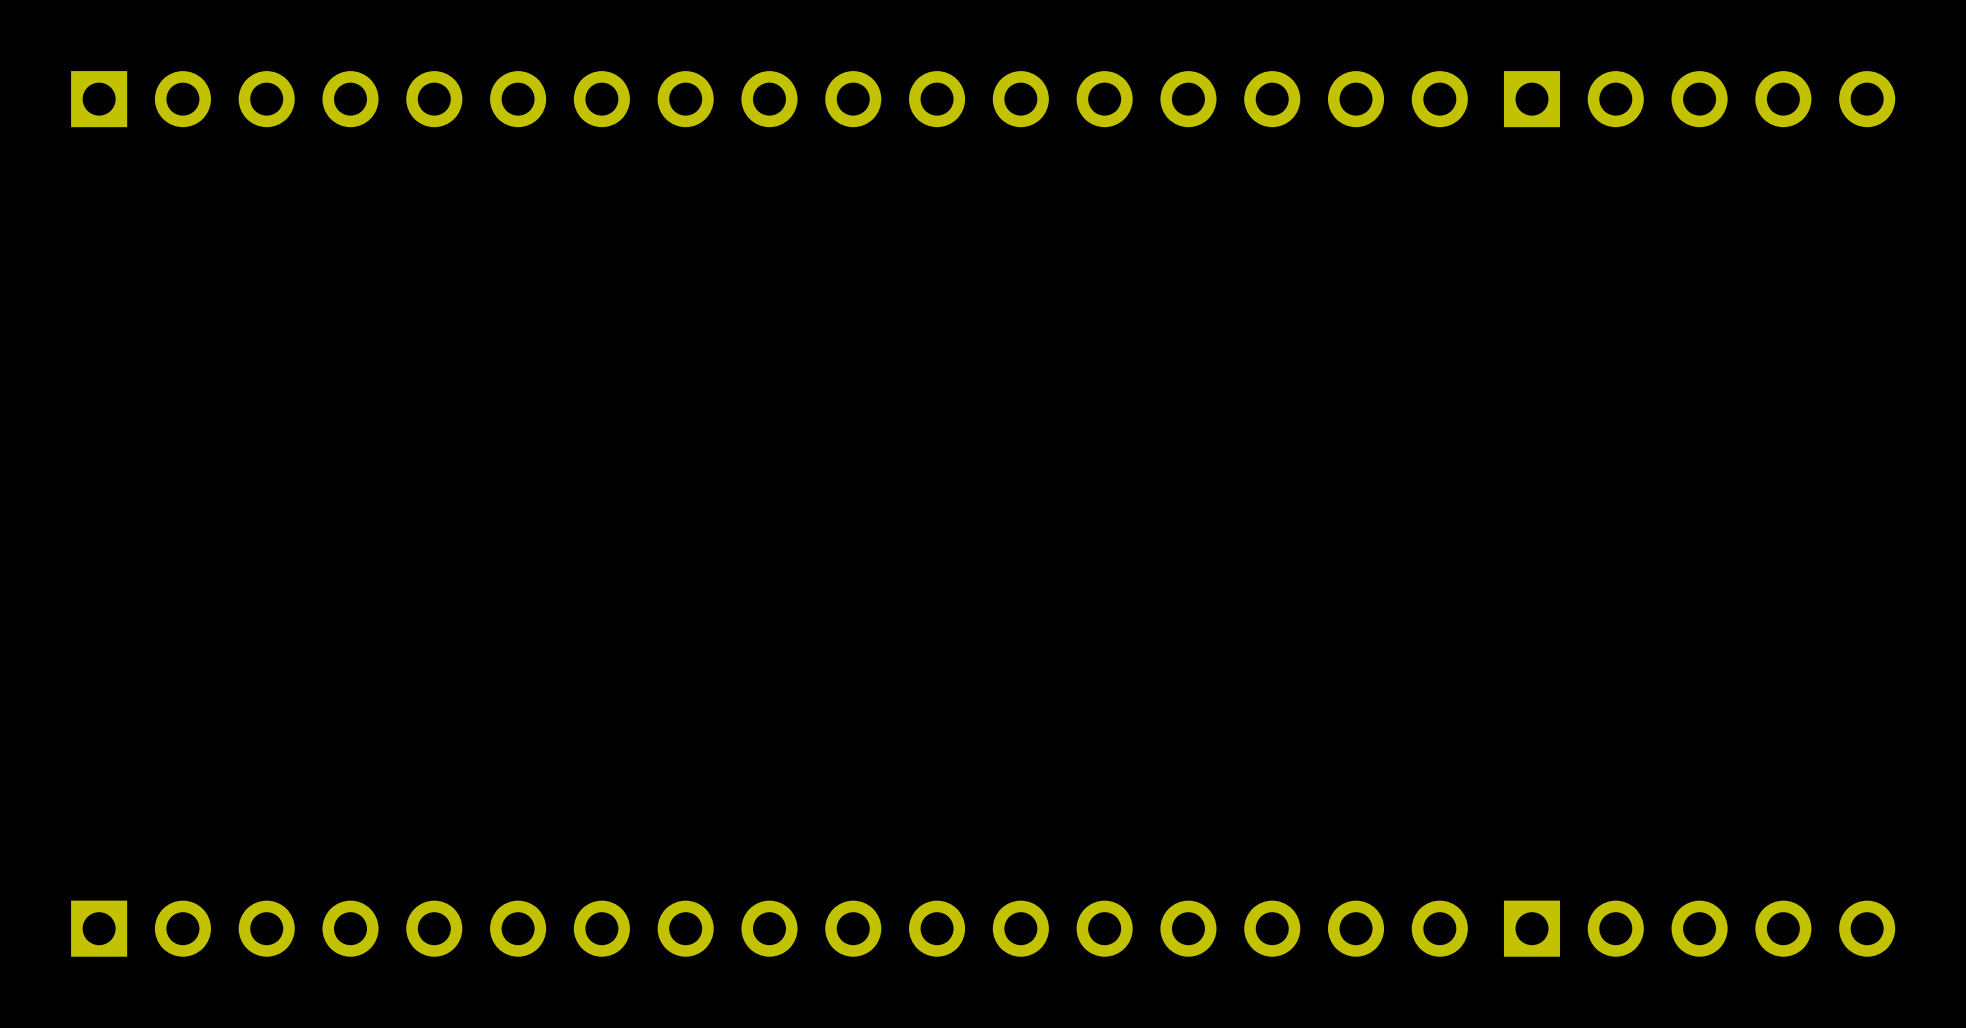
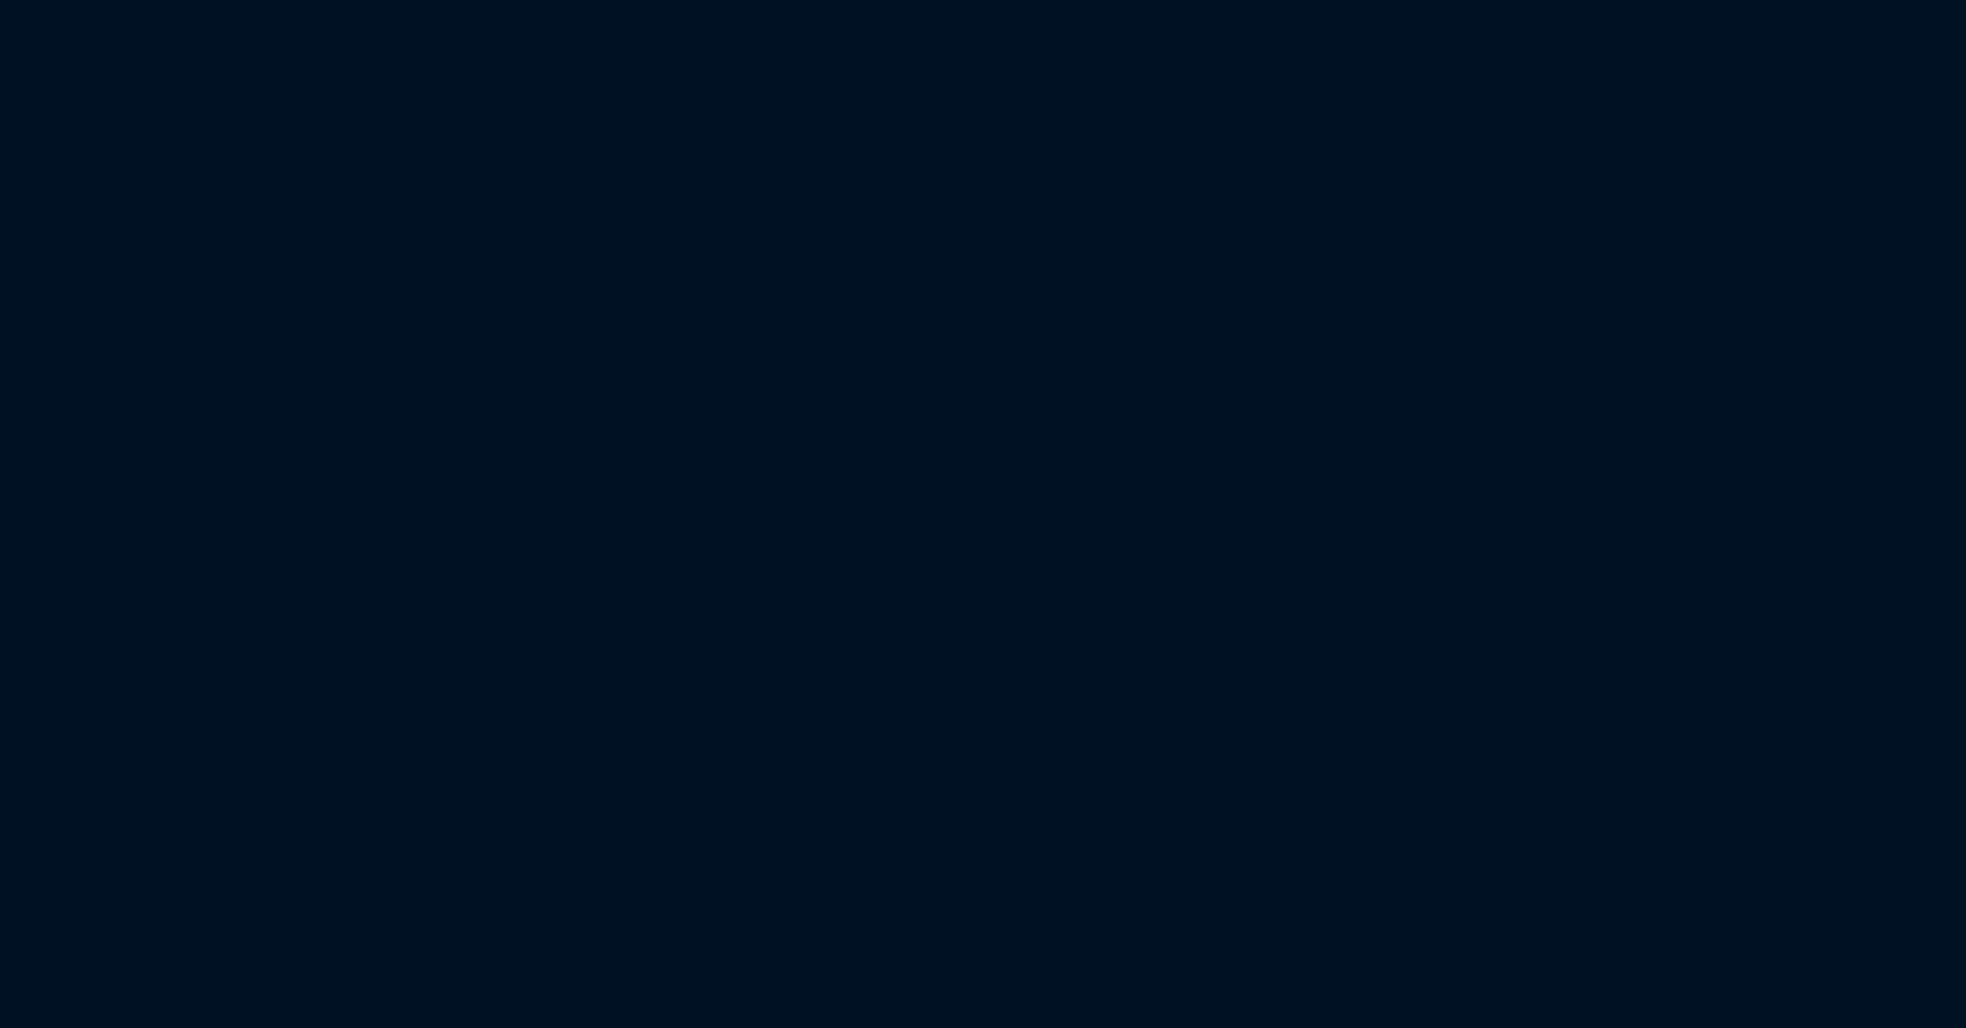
part: (769, 99) -> none
part: (1699, 99) -> none
part: (769, 928) -> none
part: (1699, 928) -> none

